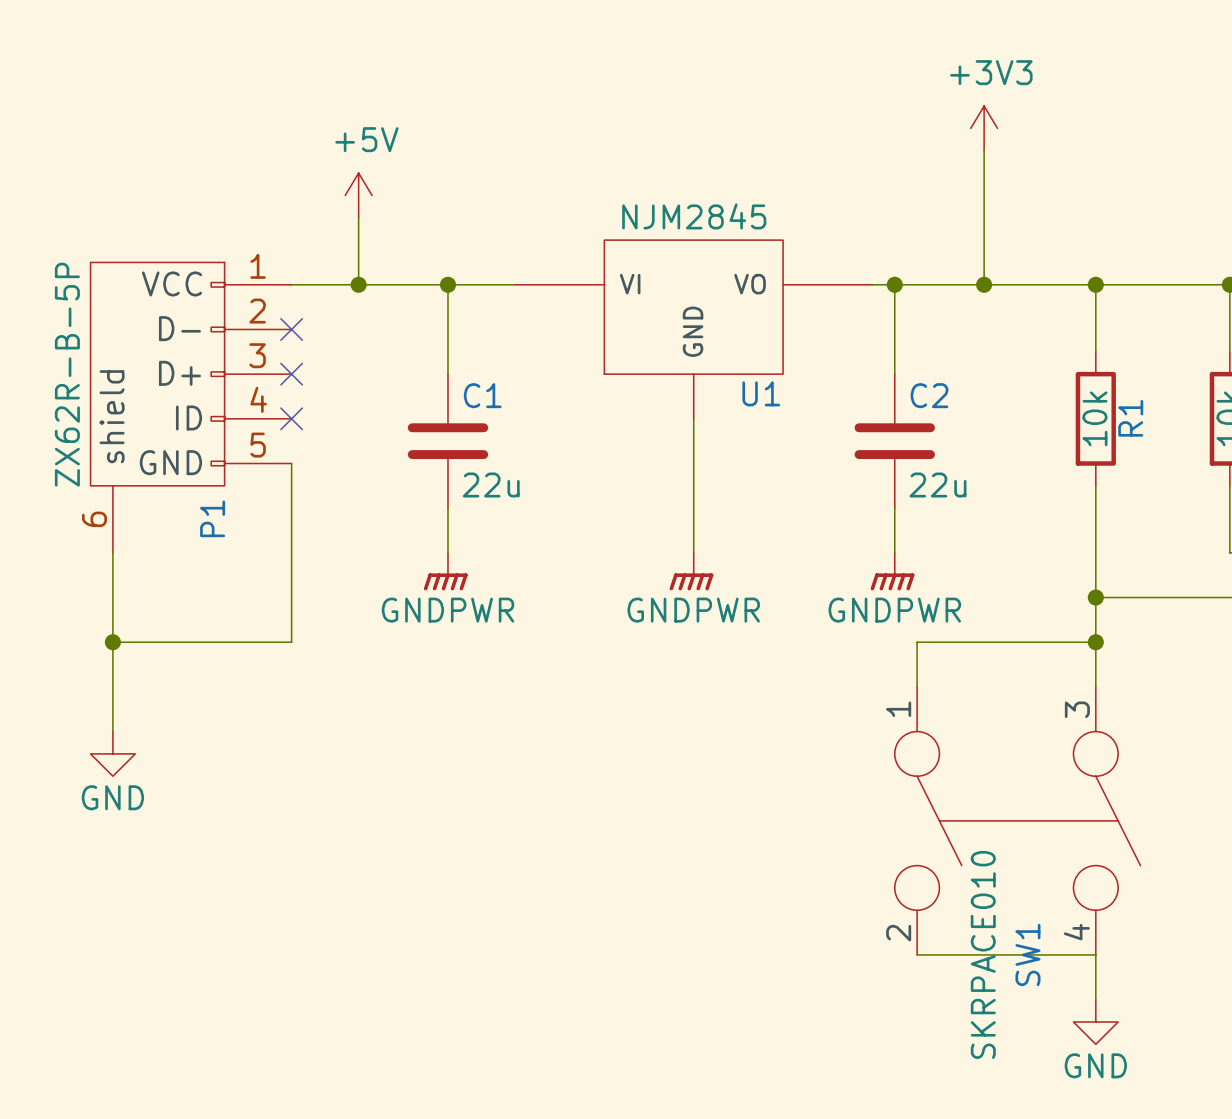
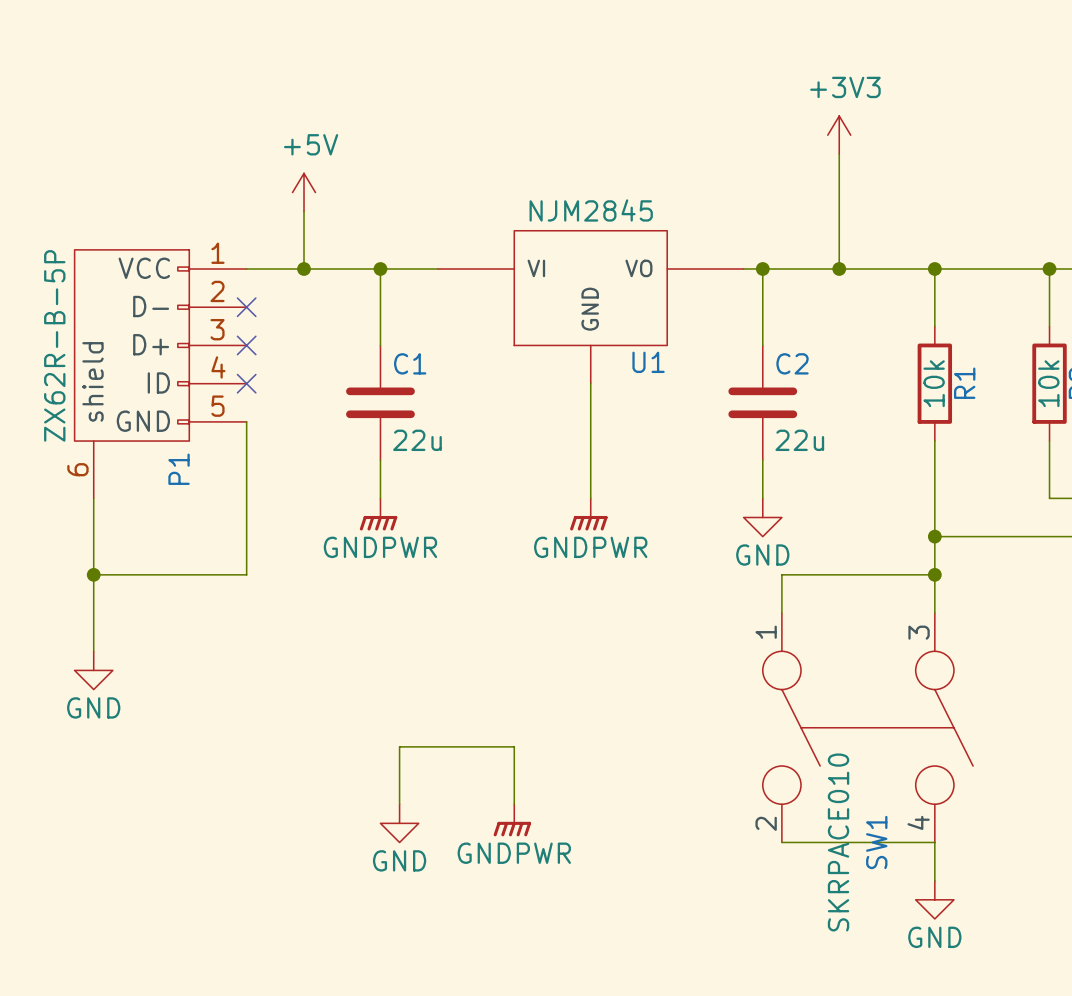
power symbol: GNDPWR (892, 571) -> GND (762, 517)
wire: none -> (399, 804) (399, 746) (514, 746) (514, 804)
power symbol: none -> GNDPWR (512, 820)
power symbol: none -> GND (399, 823)

